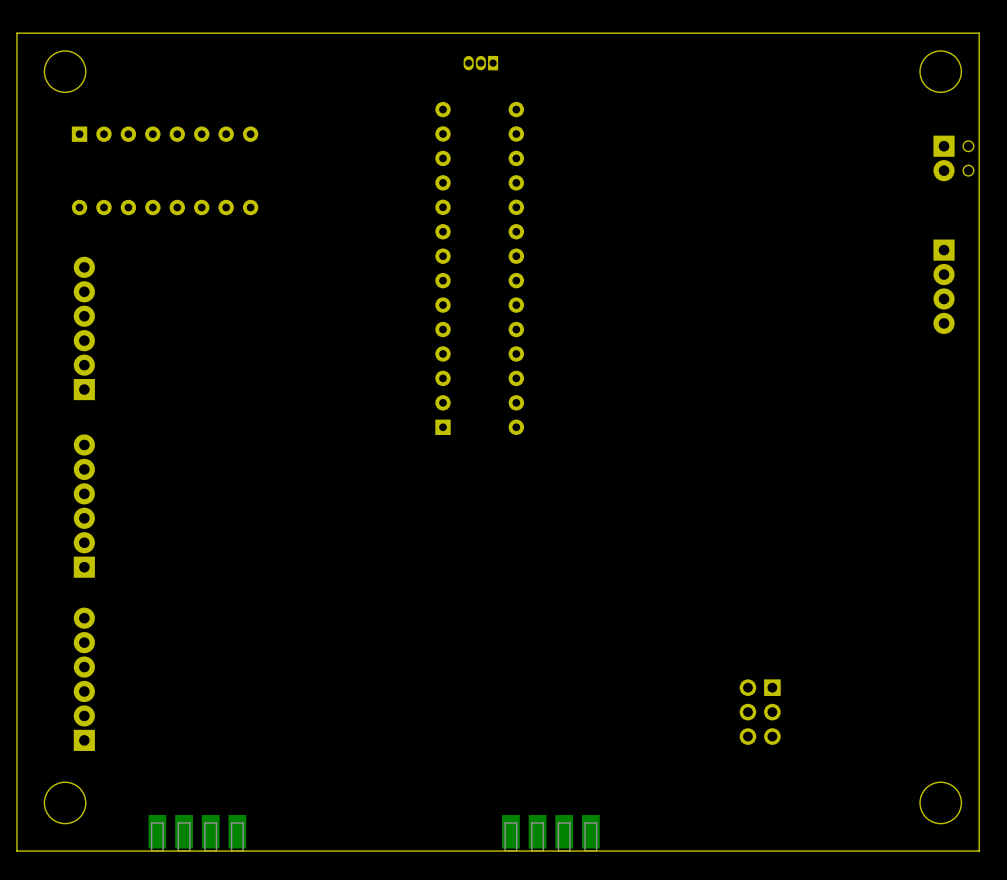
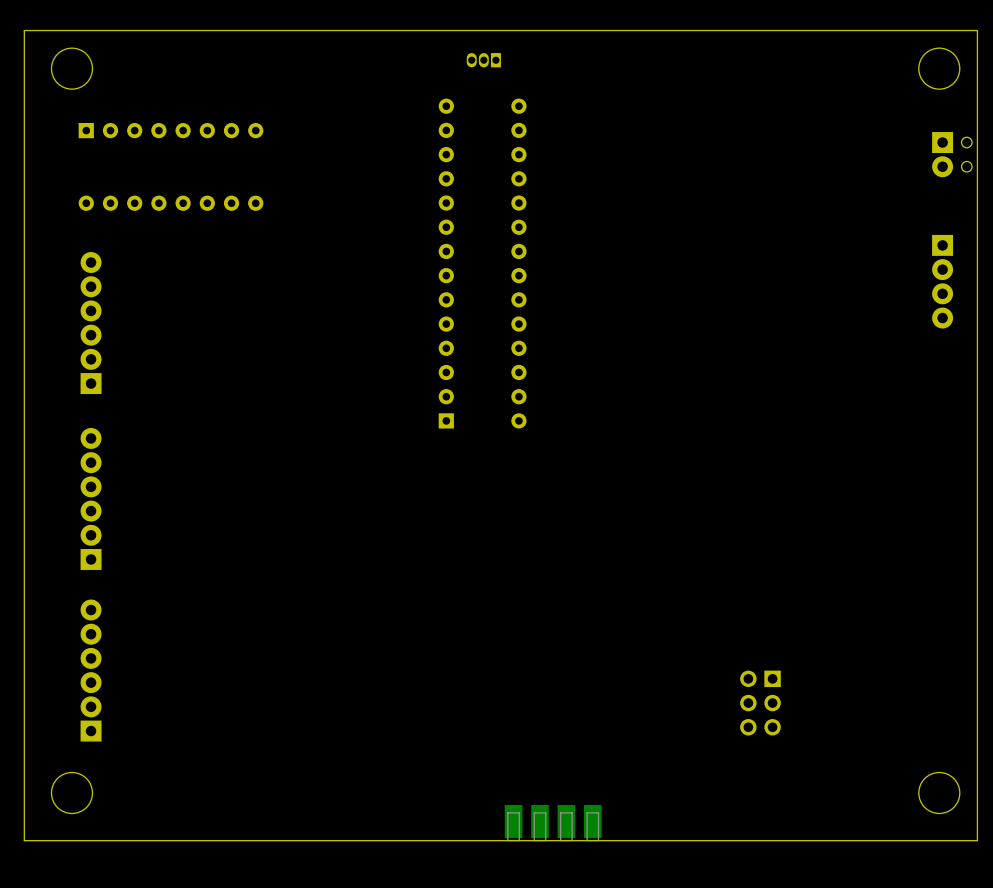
part: (197, 833) -> none

